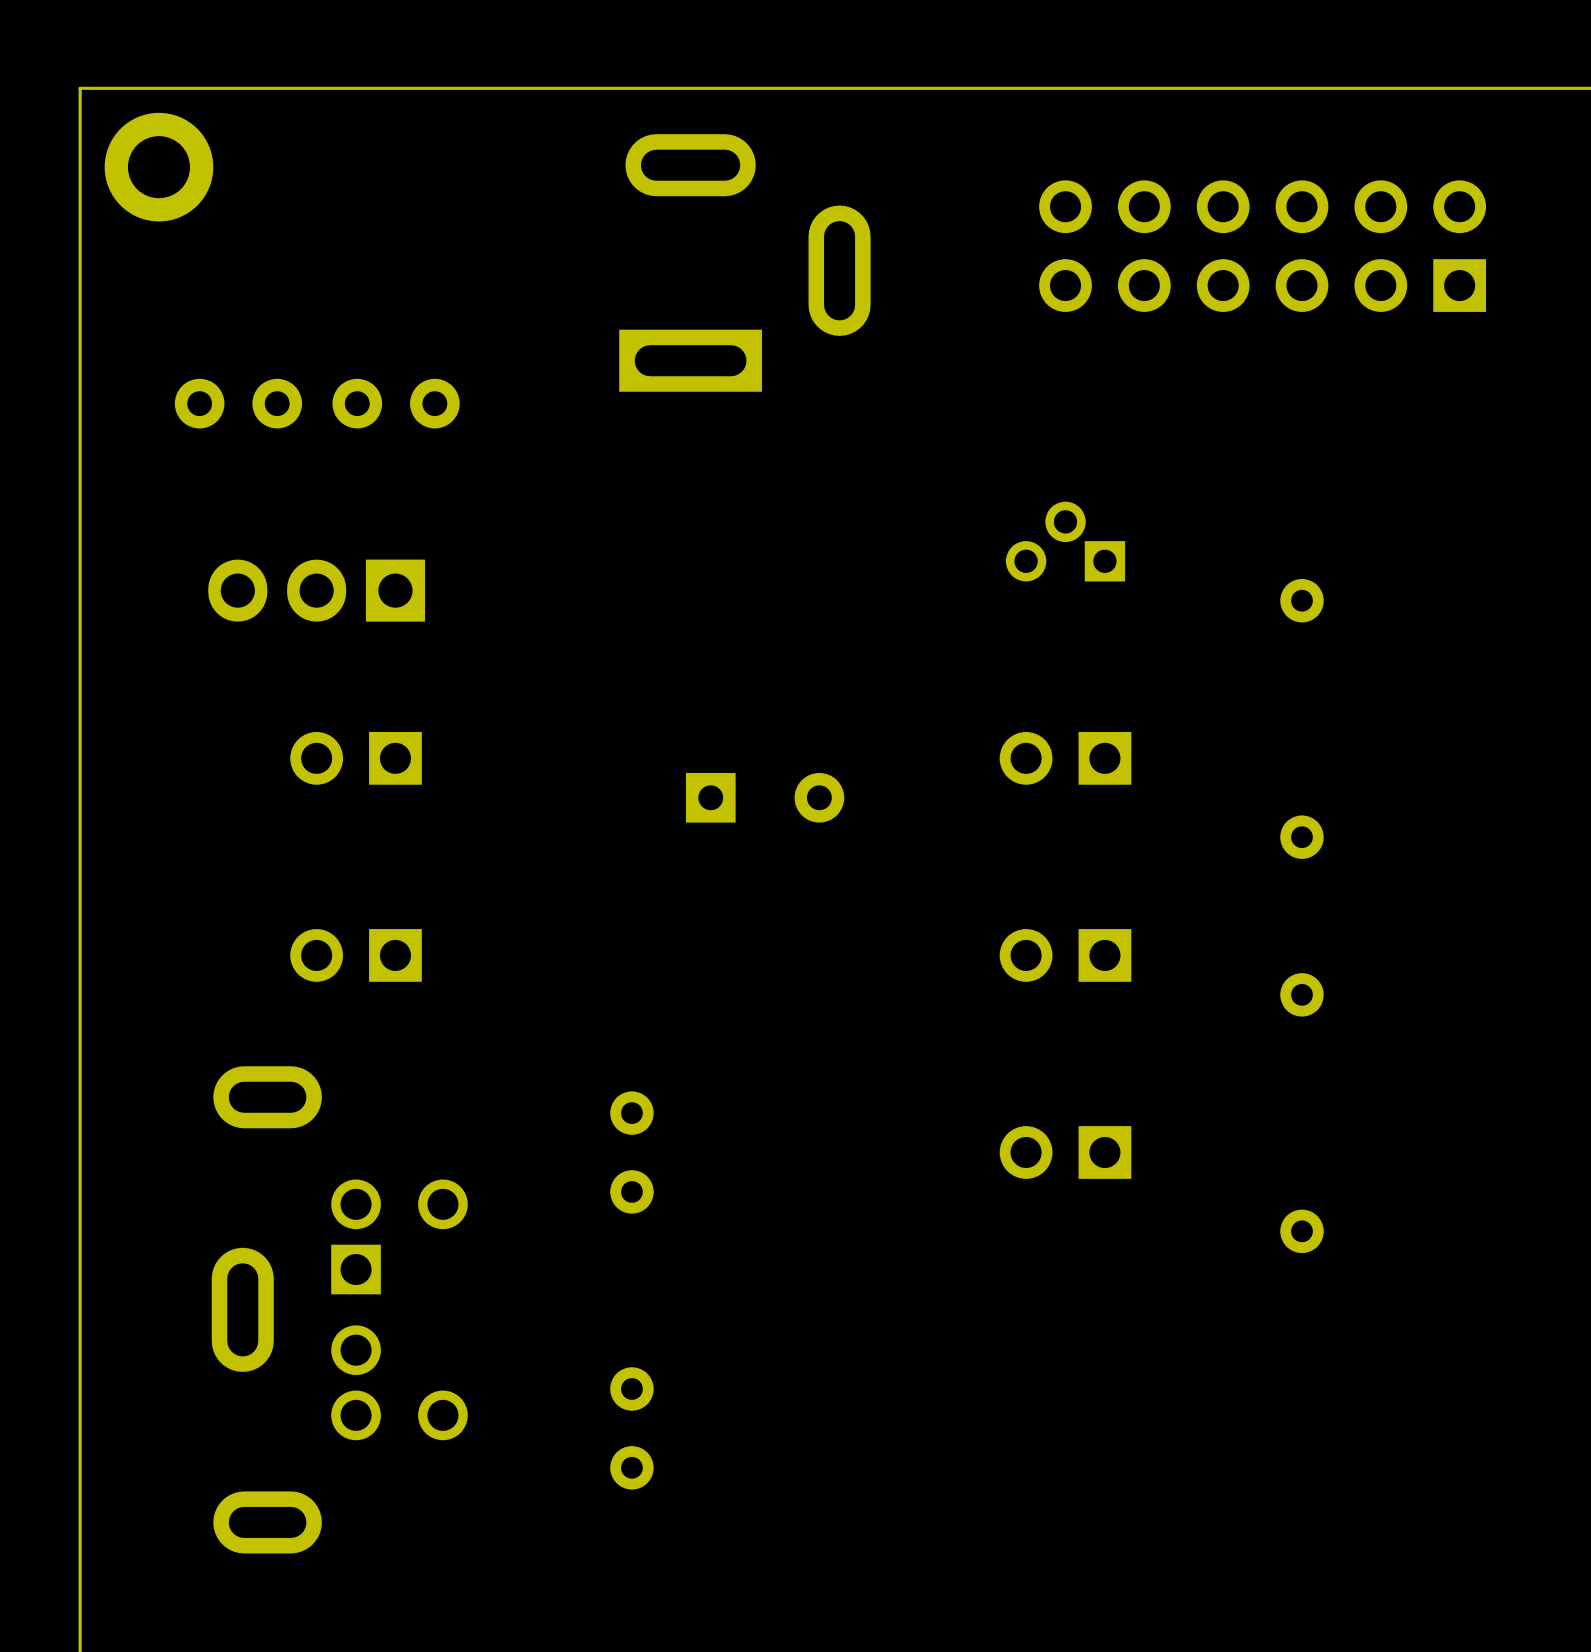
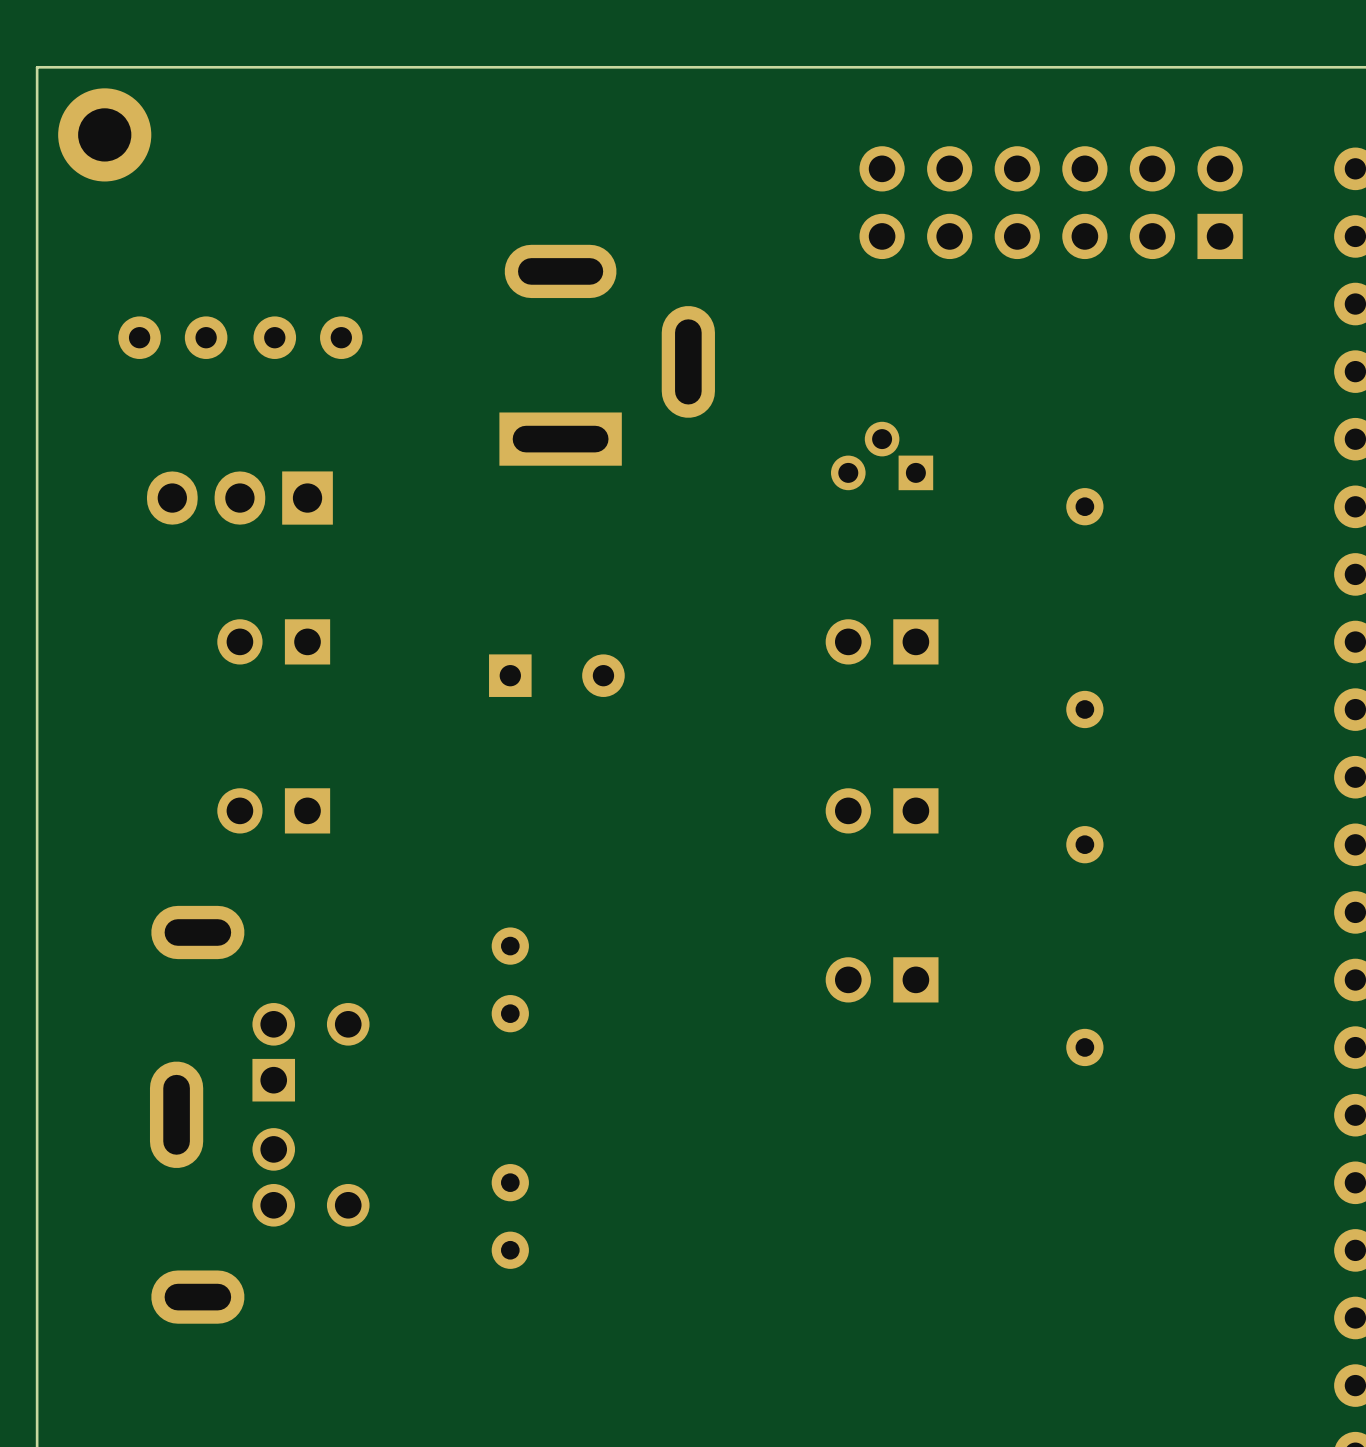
part position: (744, 262) -> (607, 355)
part position: (765, 797) -> (556, 675)

